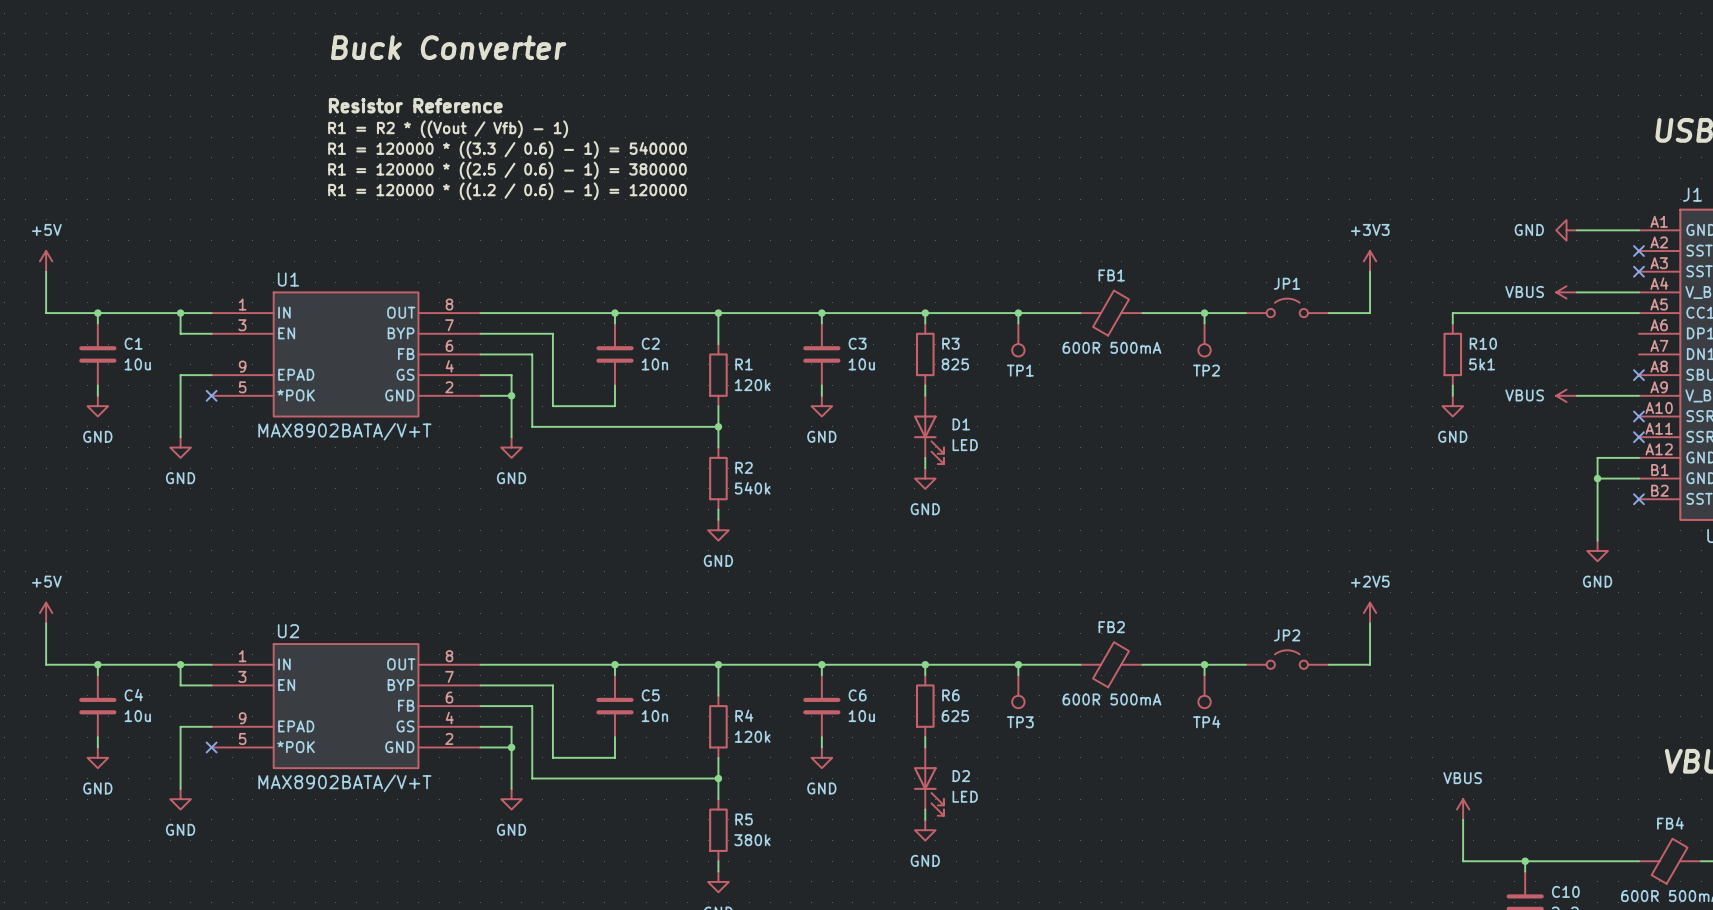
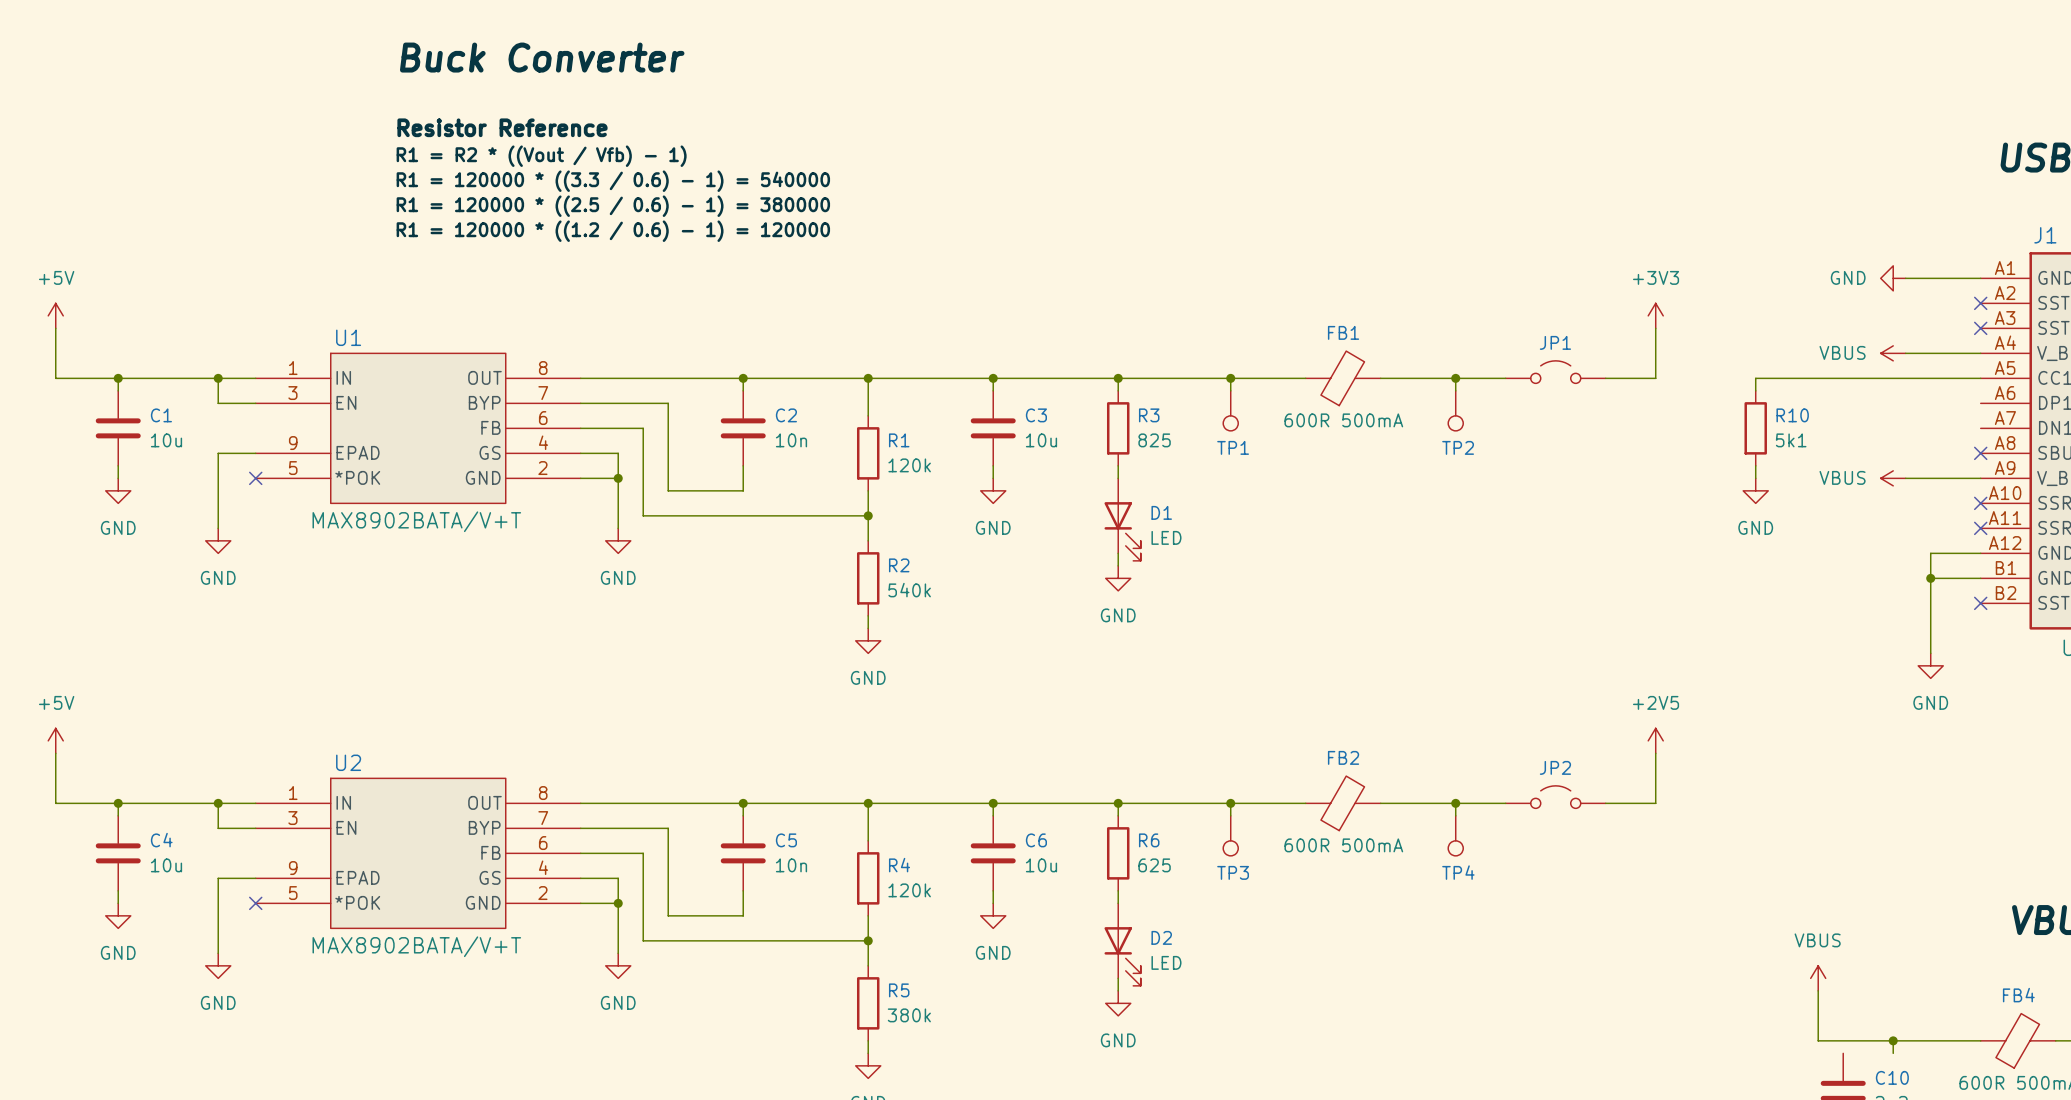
power symbol position: VBUS (1463, 809) -> VBUS (1818, 978)
wire: (1463, 819) (1463, 861) (1504, 861) -> (1818, 990) (1818, 1040)
wire: (1525, 861) (1525, 871) -> (1893, 1040) (1893, 1053)
junction position: (1525, 861) -> (1893, 1040)

